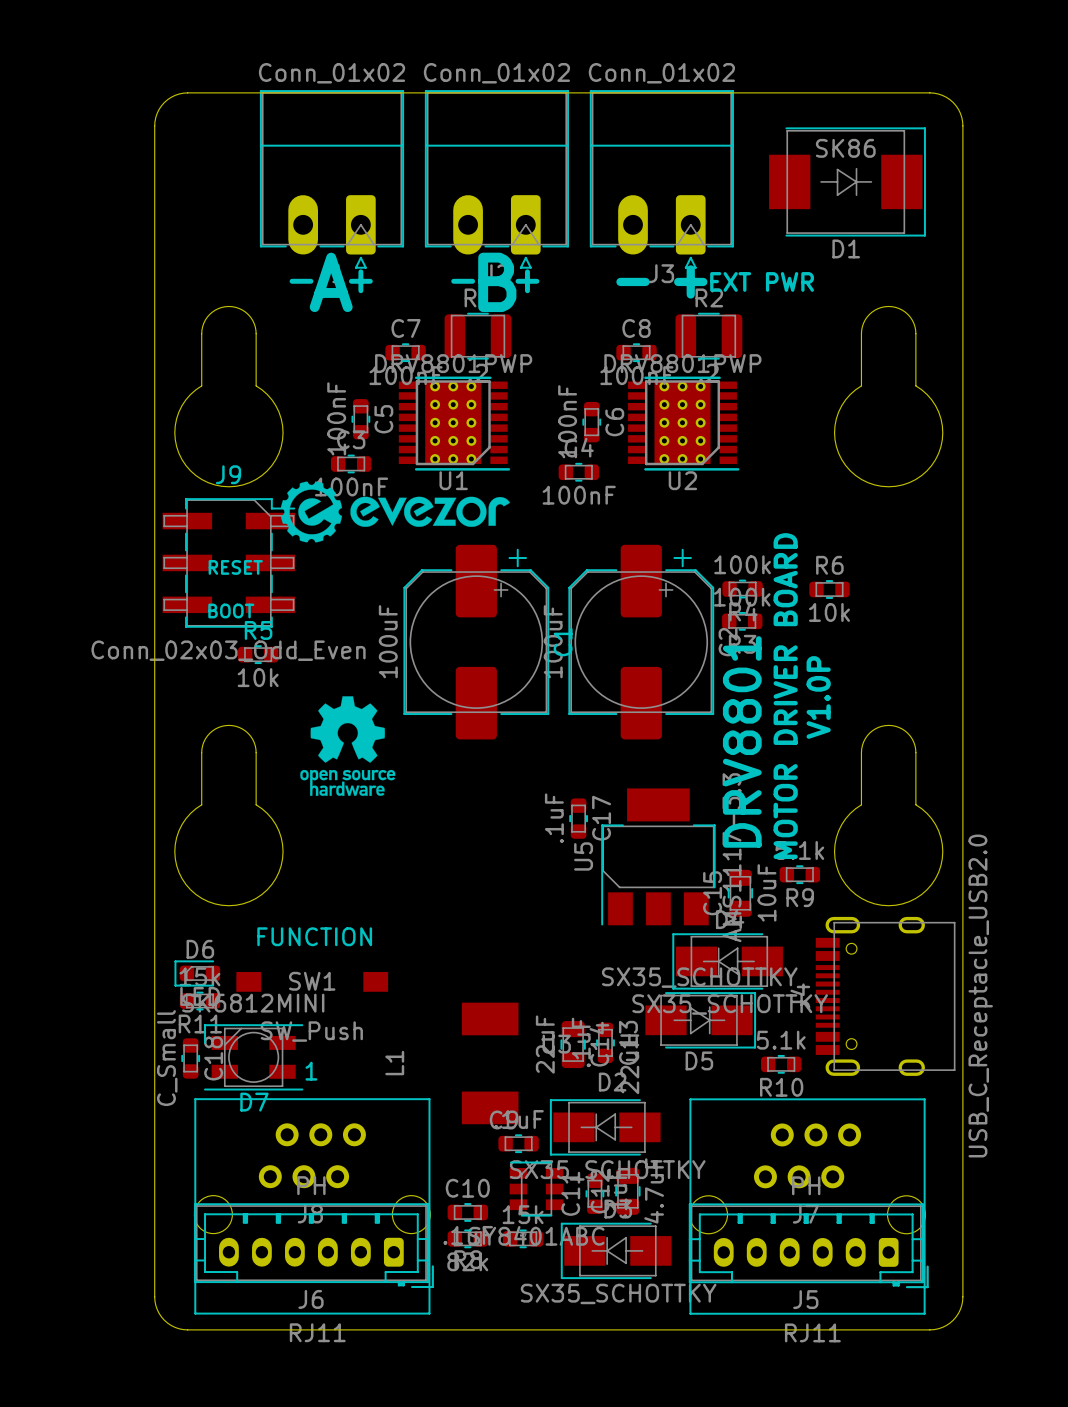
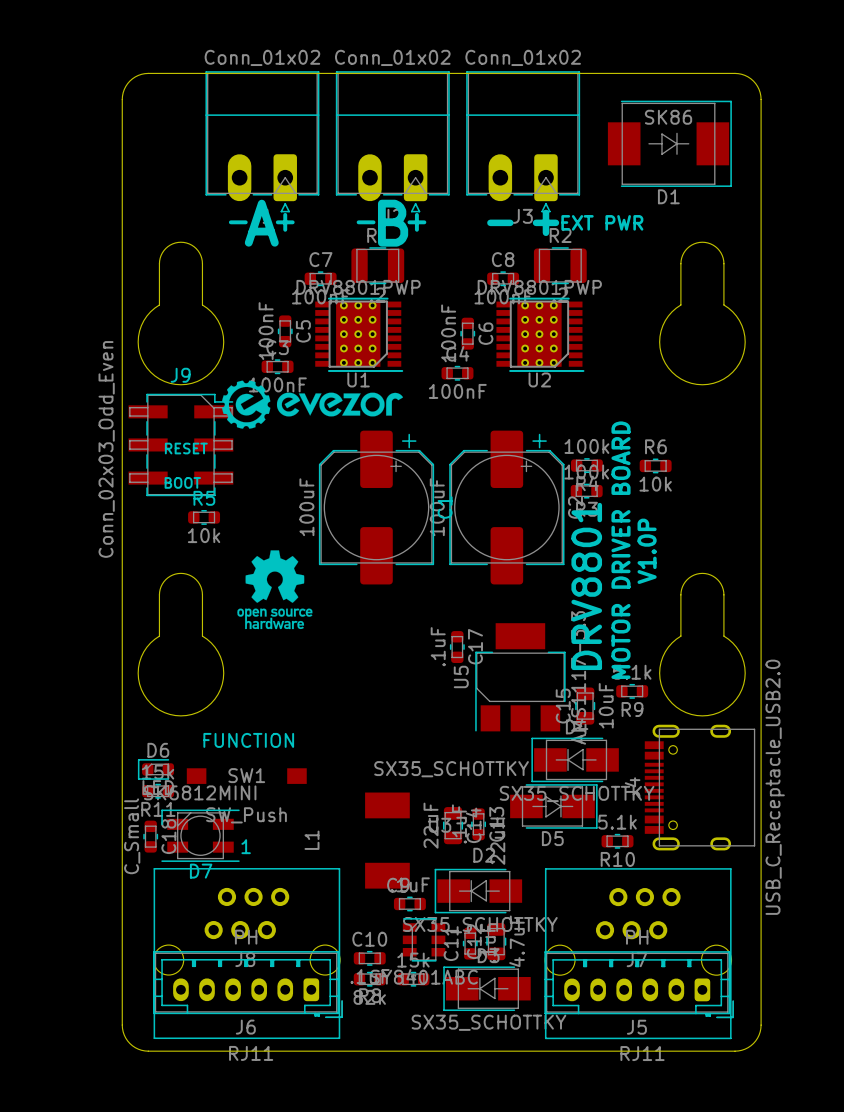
J9 value rotation: 0° (228, 650) -> 90° counterclockwise (106, 449)
D5 value position: SX35_SCHOTTKY (699, 977) -> SX35_SCHOTTKY (451, 769)

